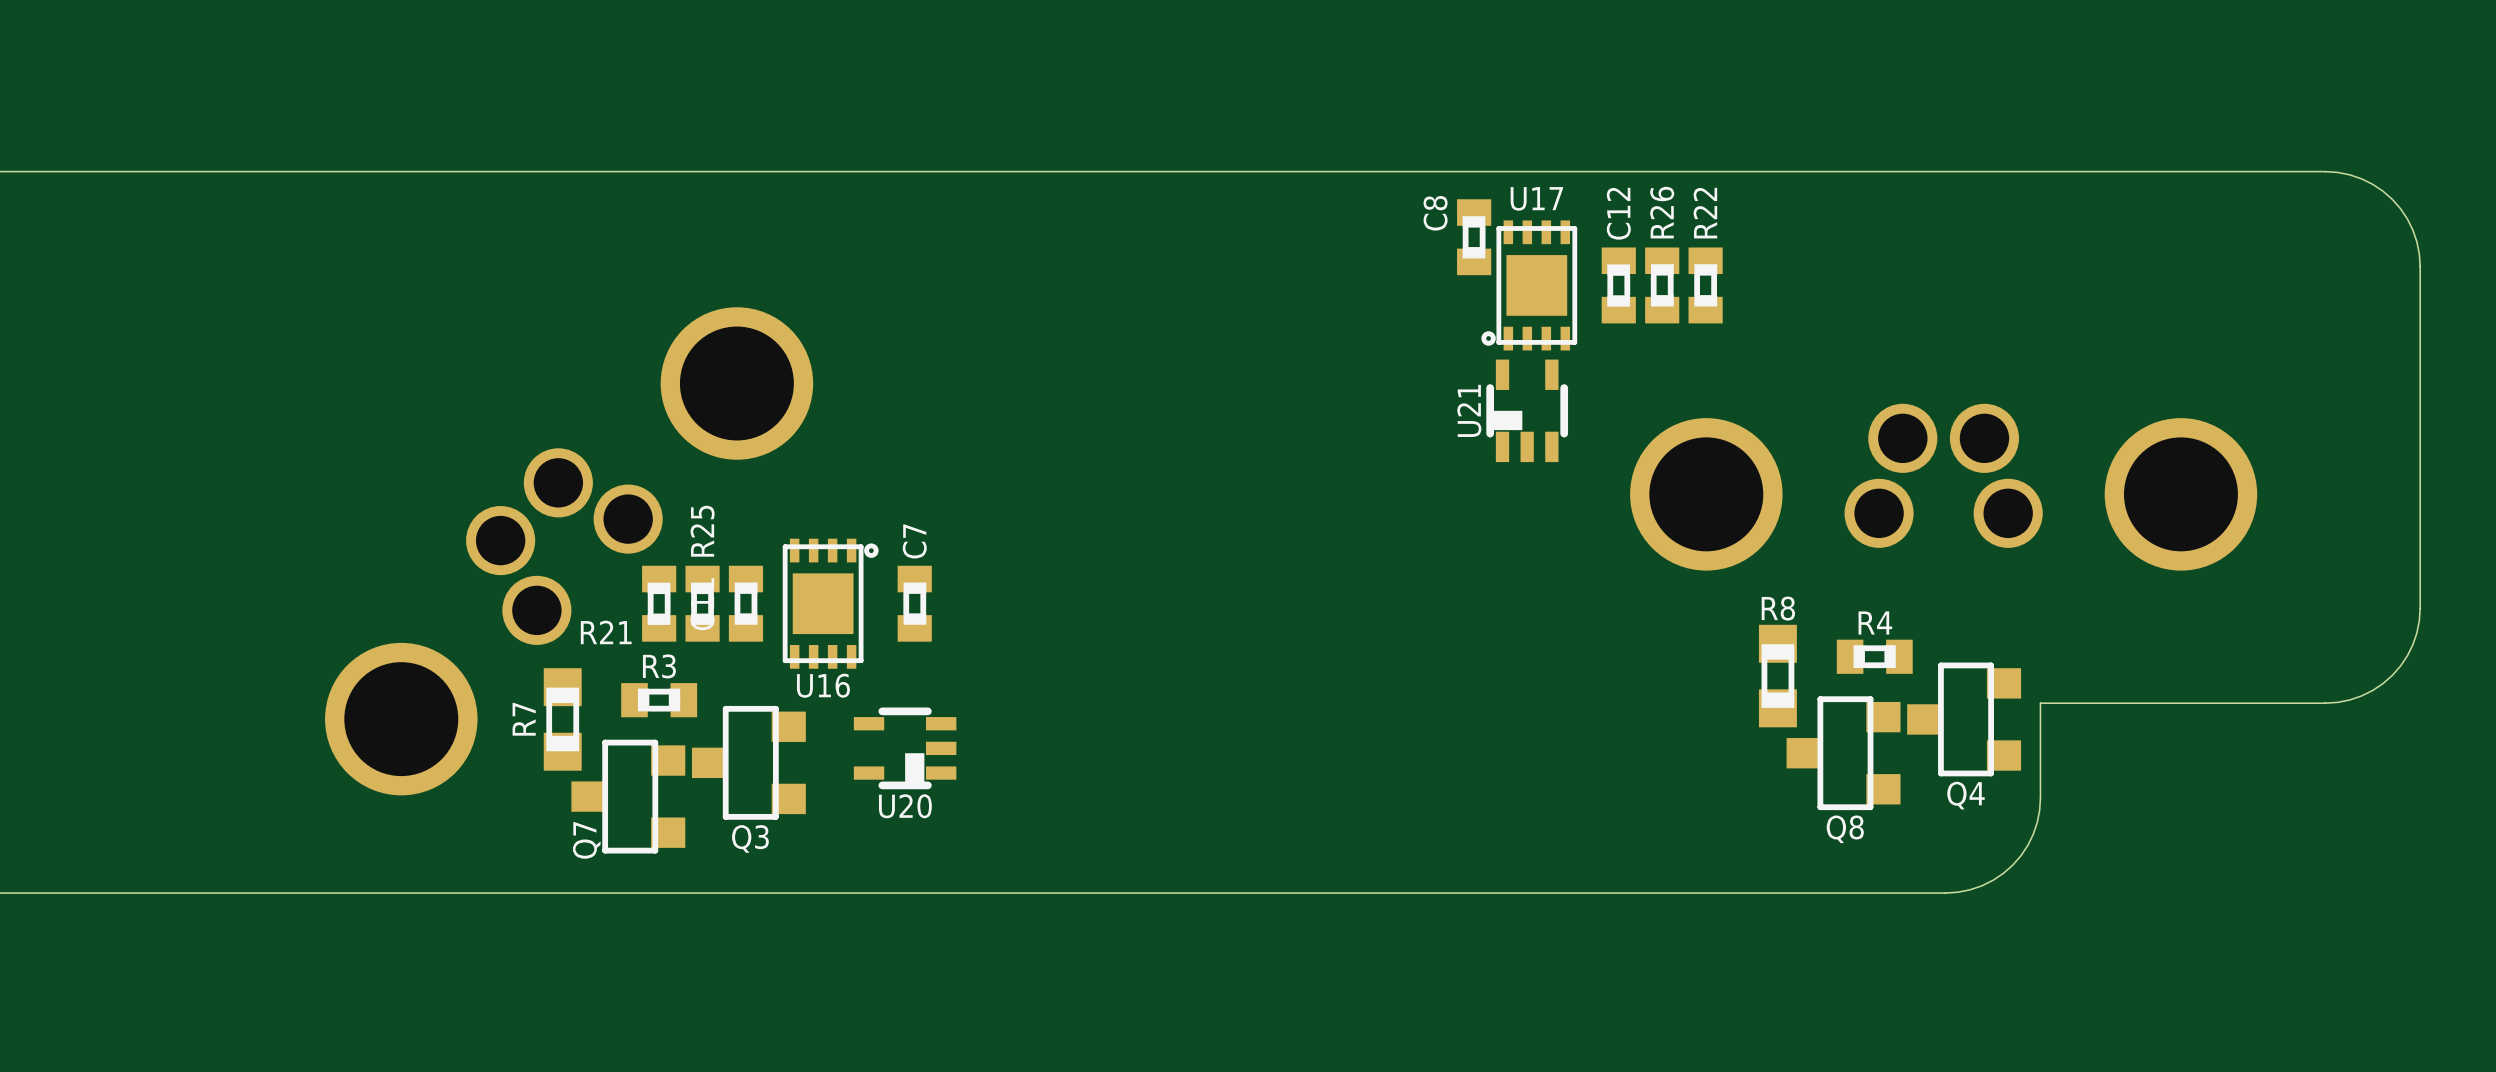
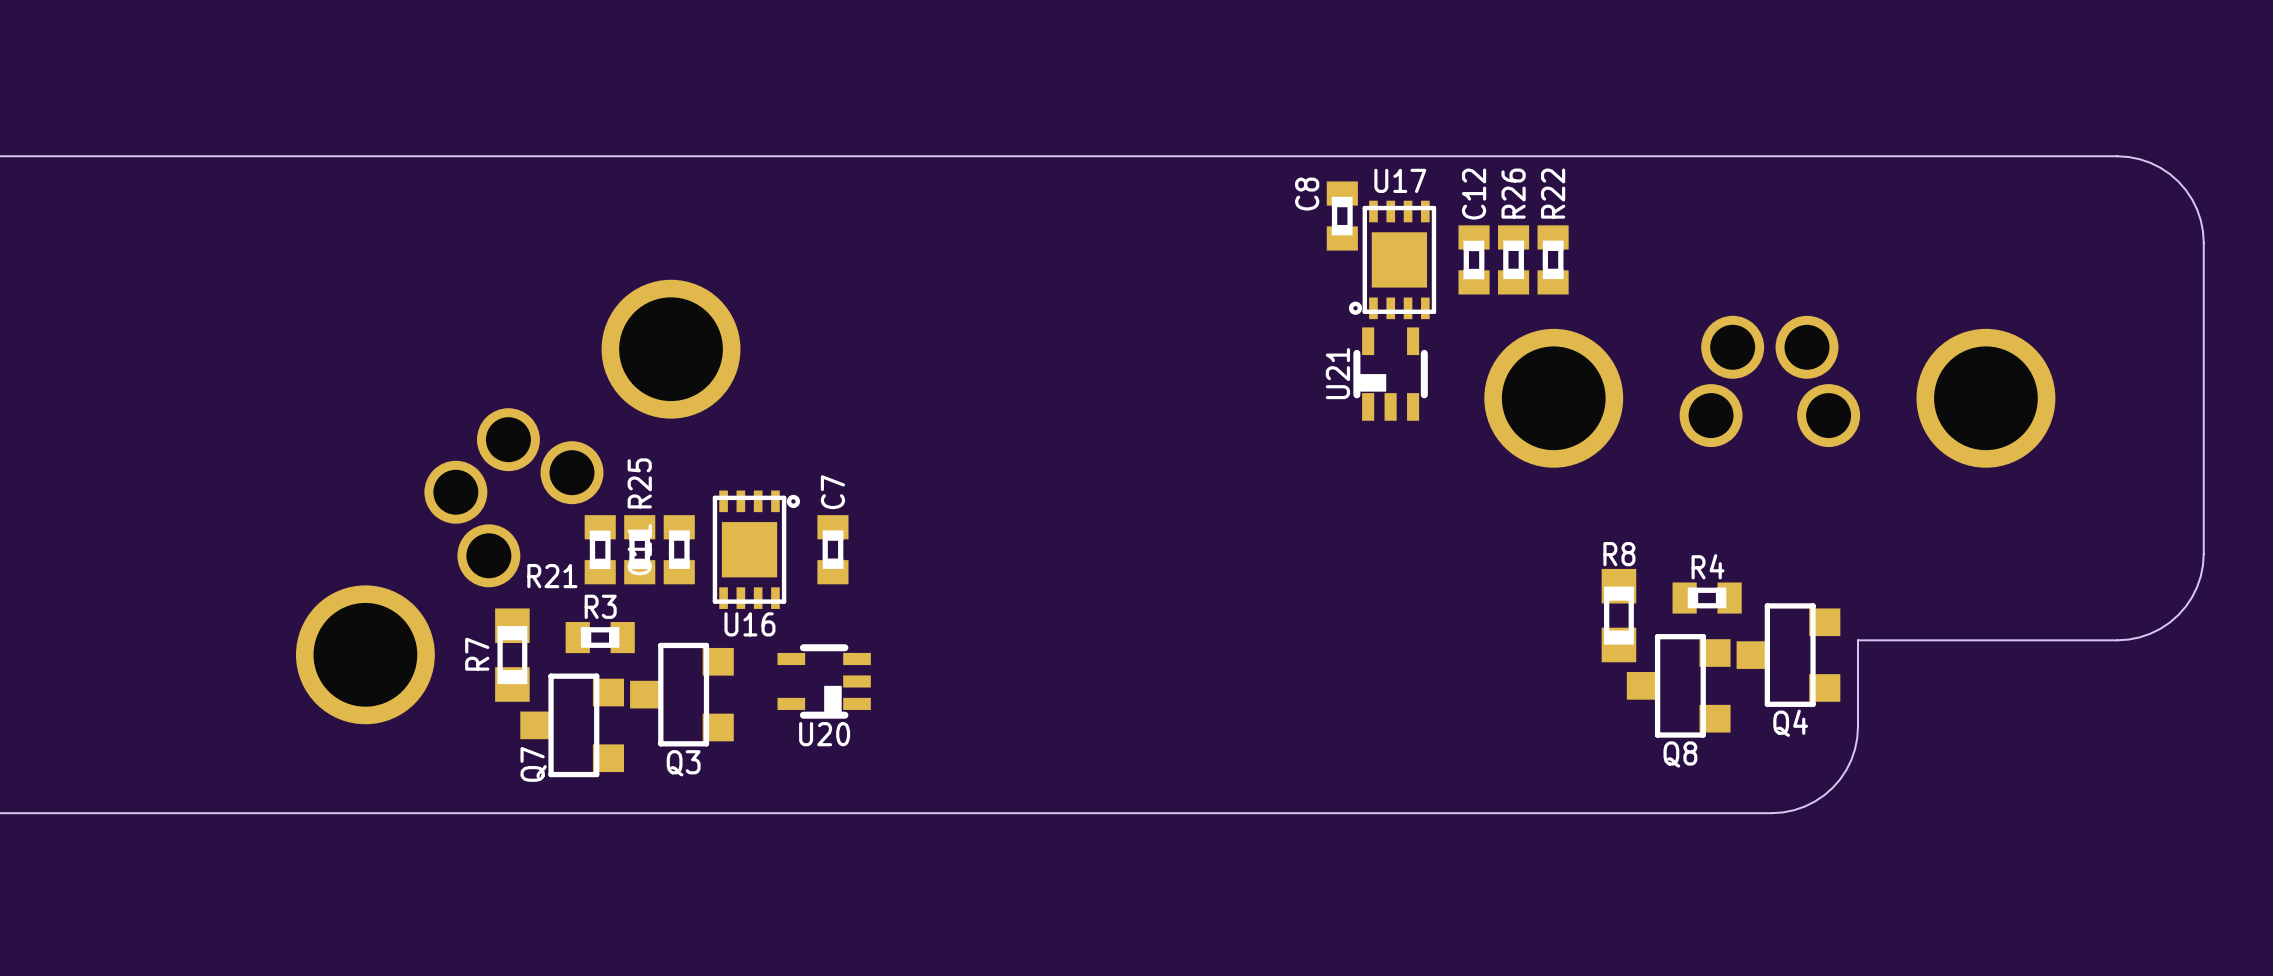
part position: (1943, 487) -> (1769, 391)

